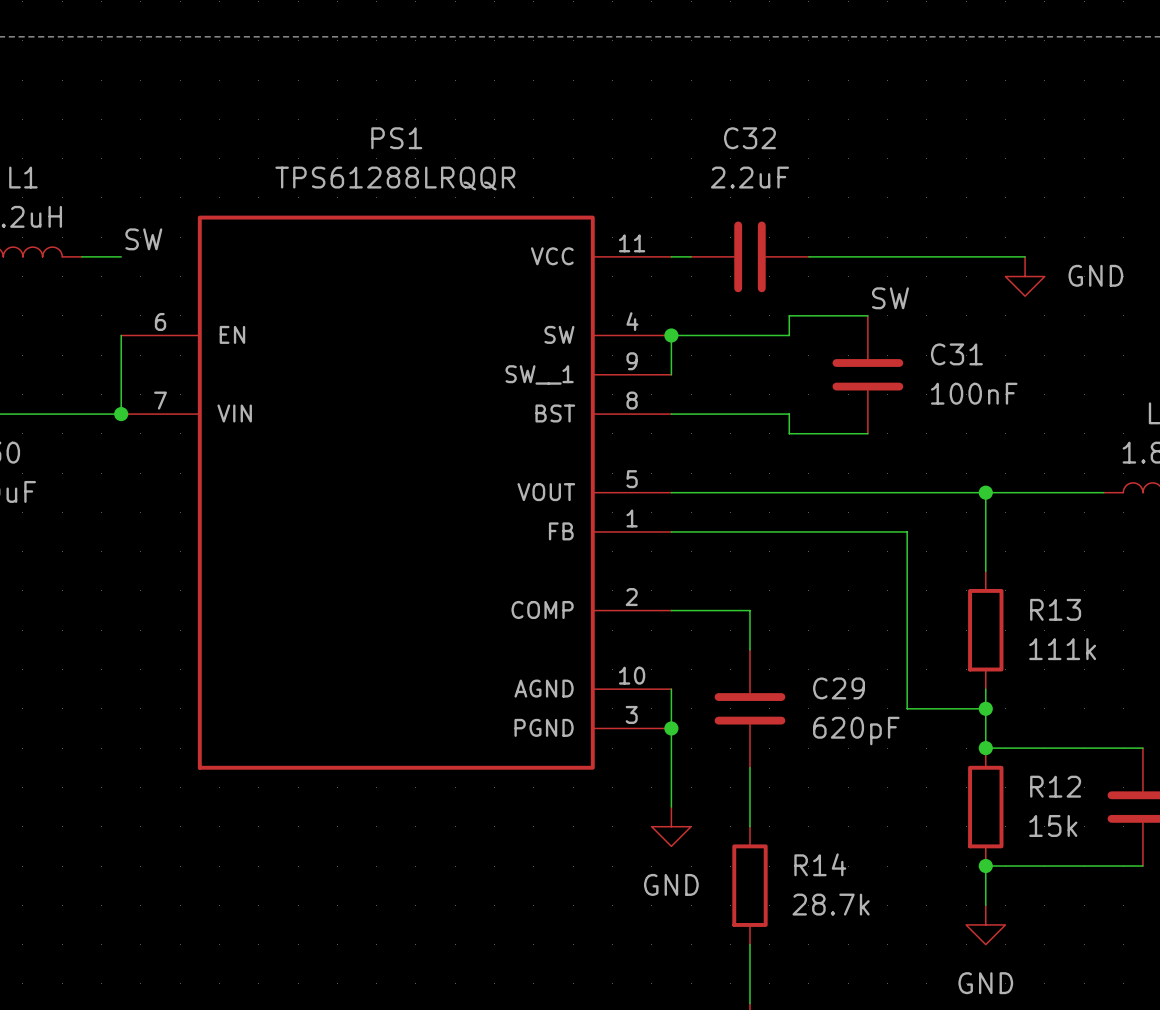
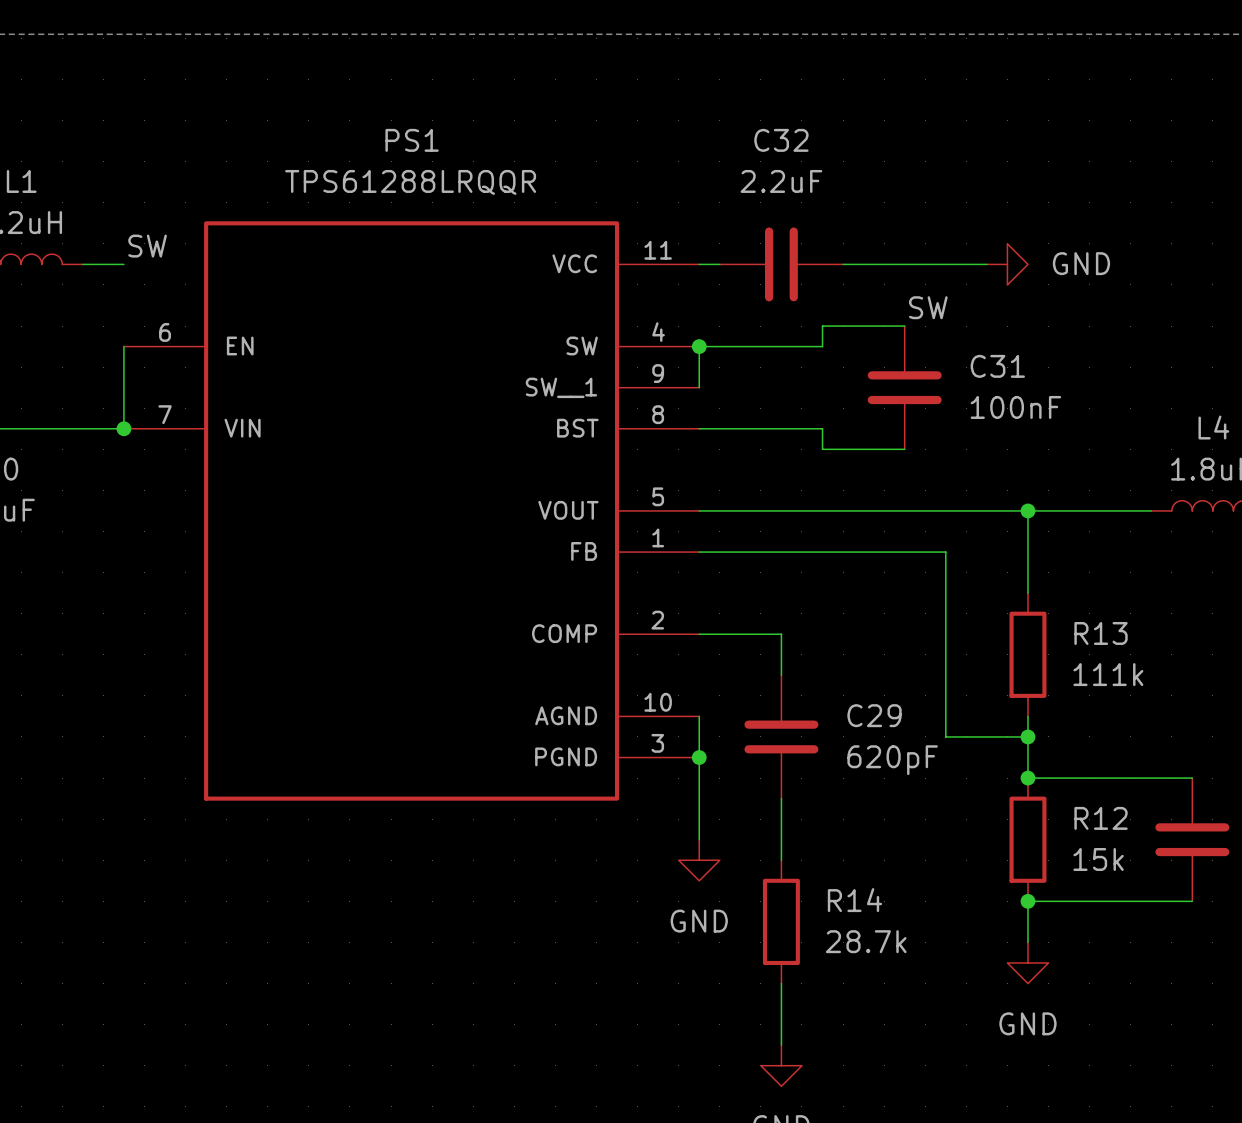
wire: (946, 256) (1025, 256) -> none
power symbol rotation: 0° (1025, 276) -> 90° counterclockwise (1007, 264)
power symbol position: GND (1025, 276) -> GND (1007, 264)

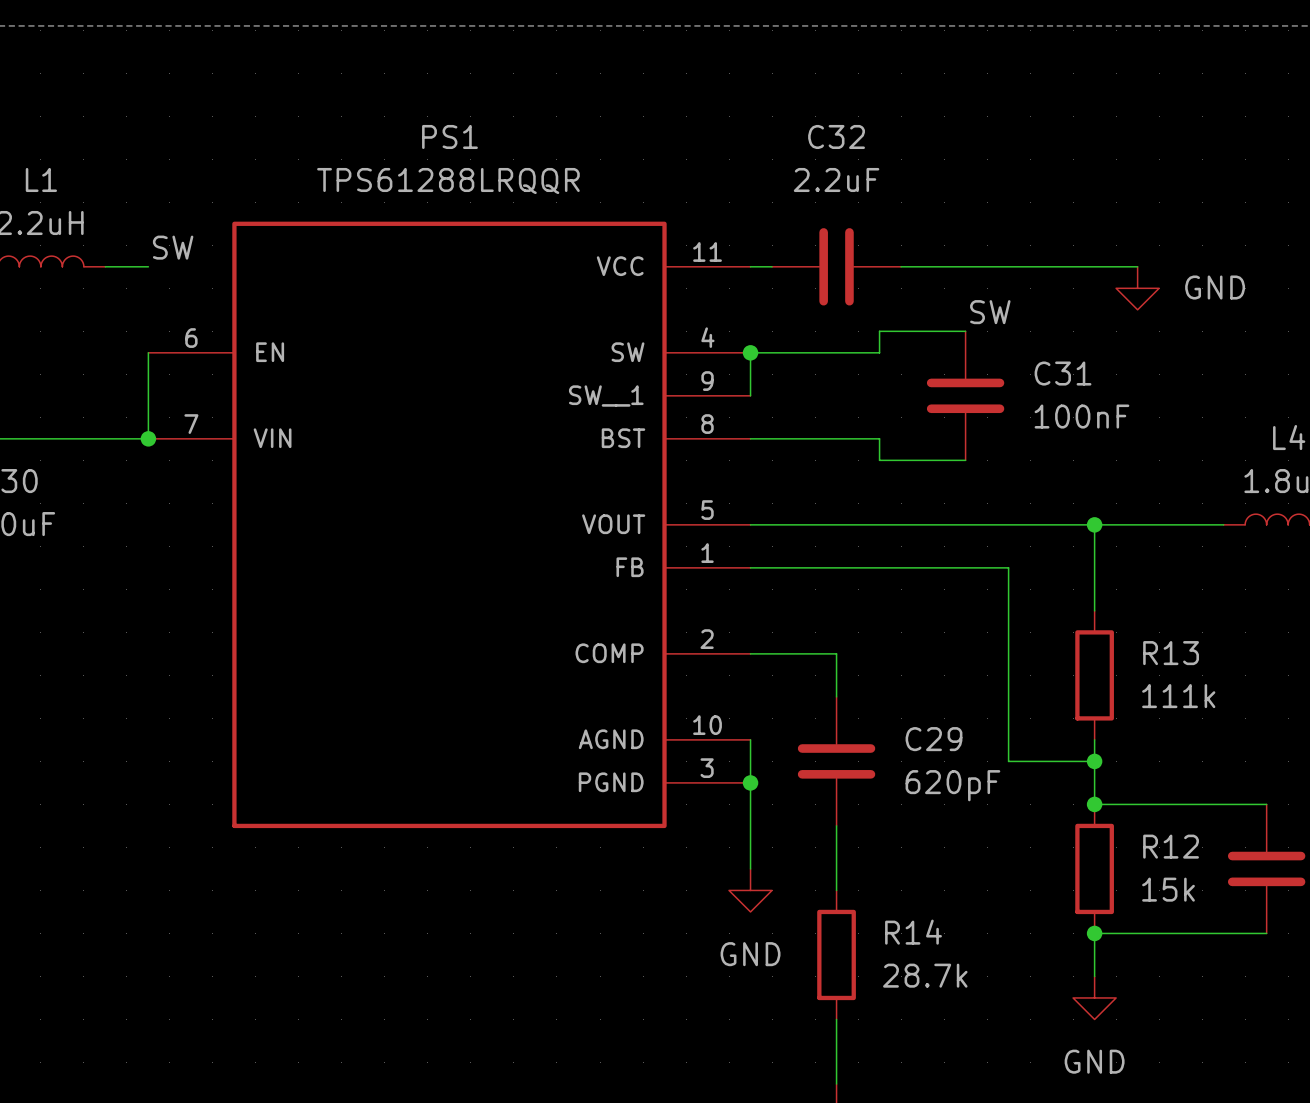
wire: none -> (1051, 266) (1137, 266)
power symbol rotation: 0° (1007, 264) -> 90° clockwise (1137, 288)
power symbol position: GND (1007, 264) -> GND (1137, 288)

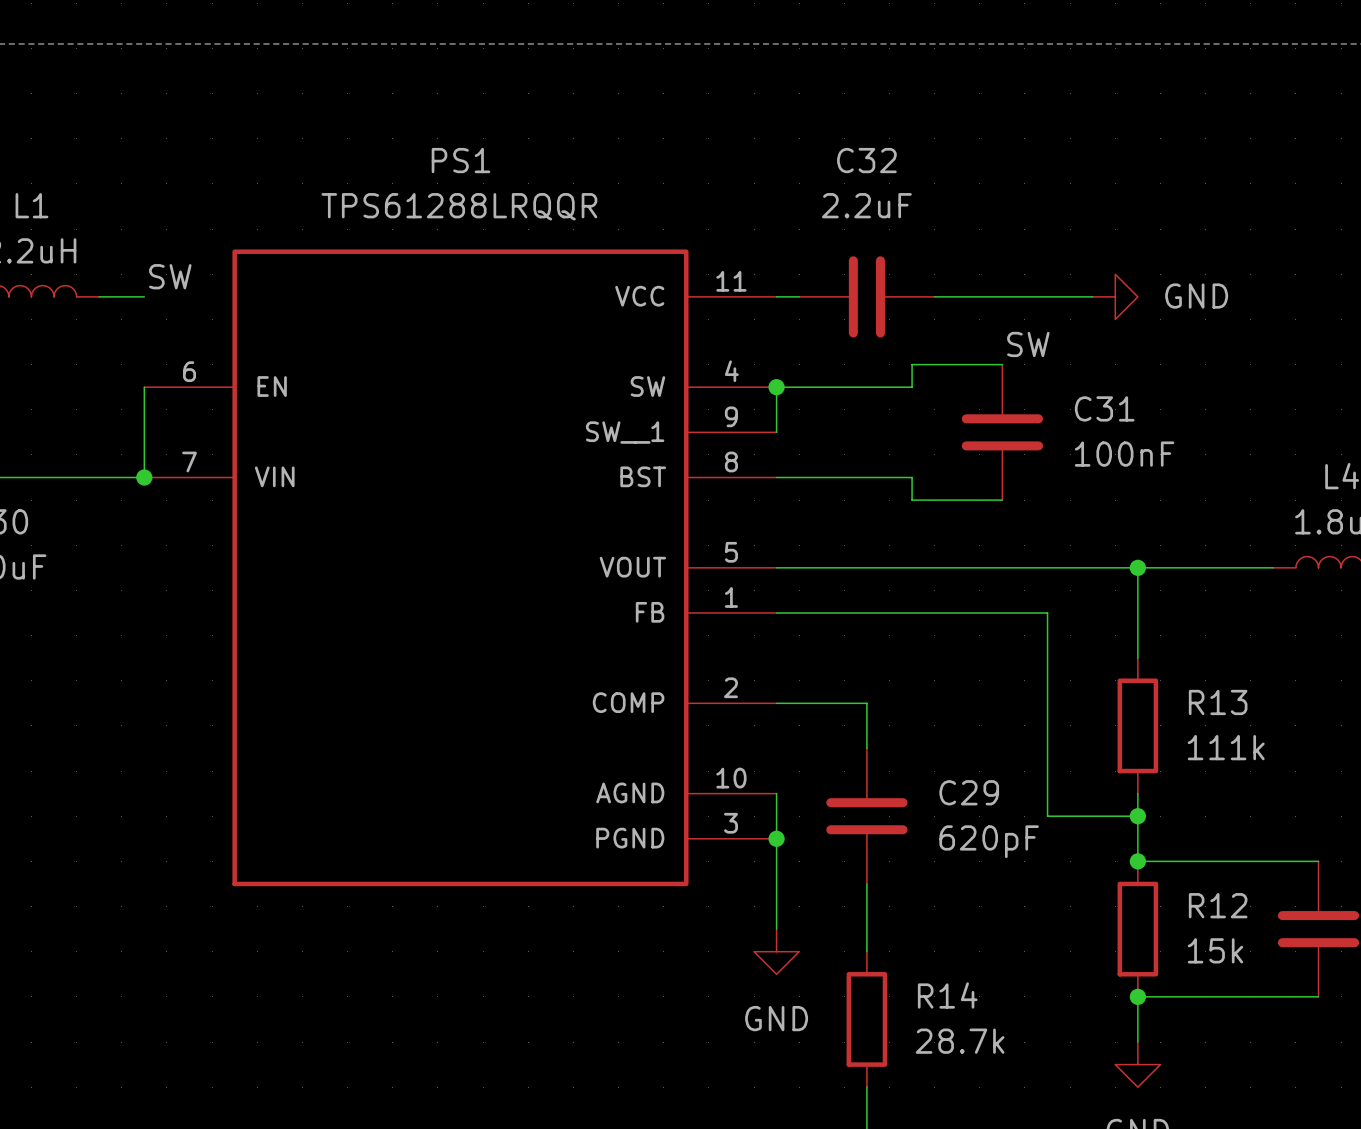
wire: (1051, 266) (1137, 266) -> none
power symbol rotation: 0° (1137, 288) -> 90° counterclockwise (1115, 296)
power symbol position: GND (1137, 288) -> GND (1115, 296)

